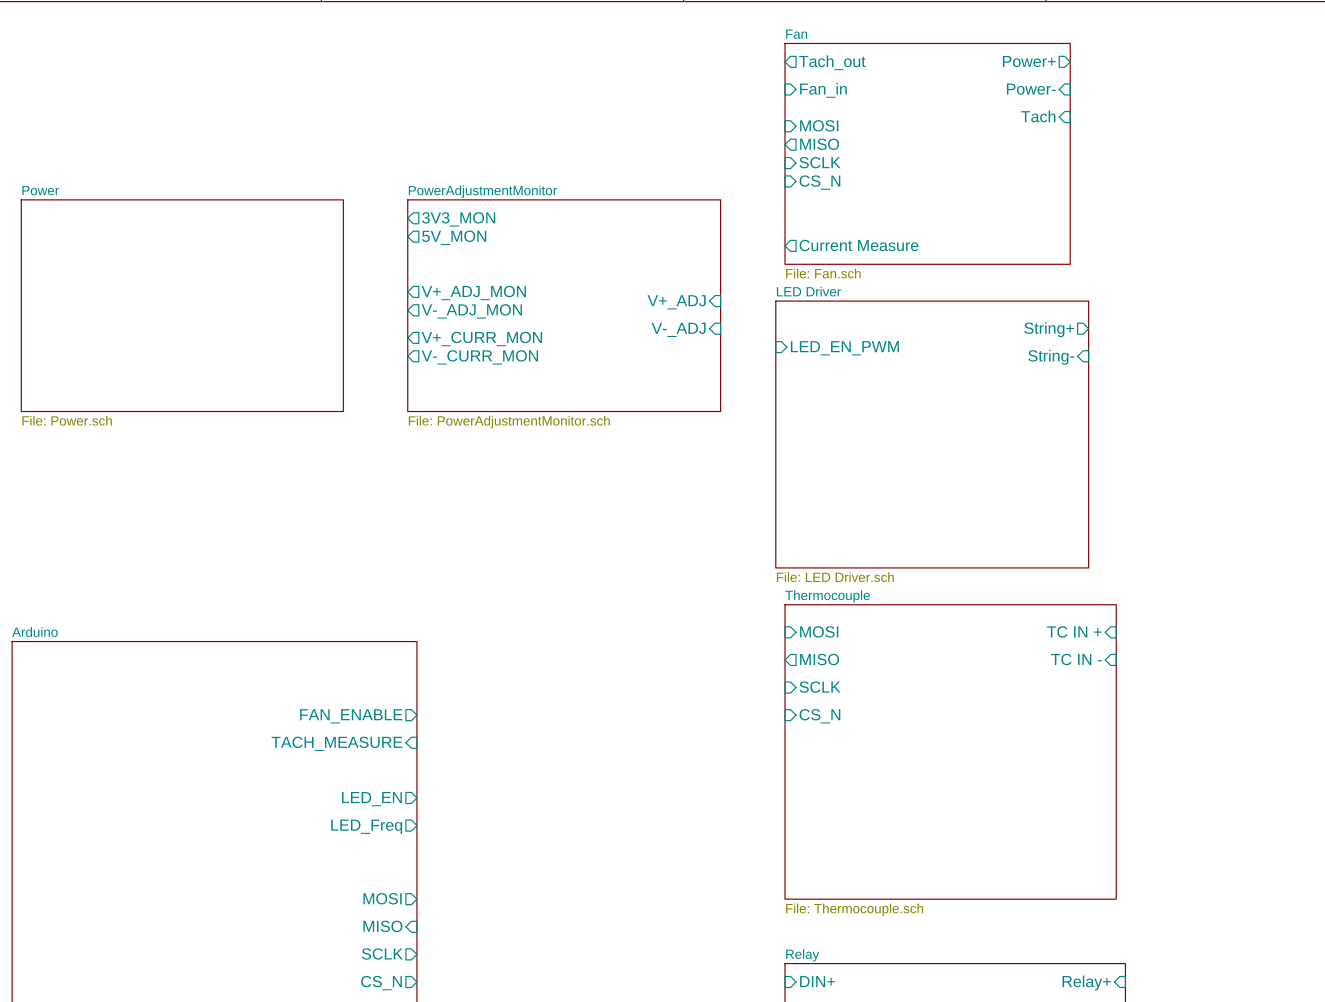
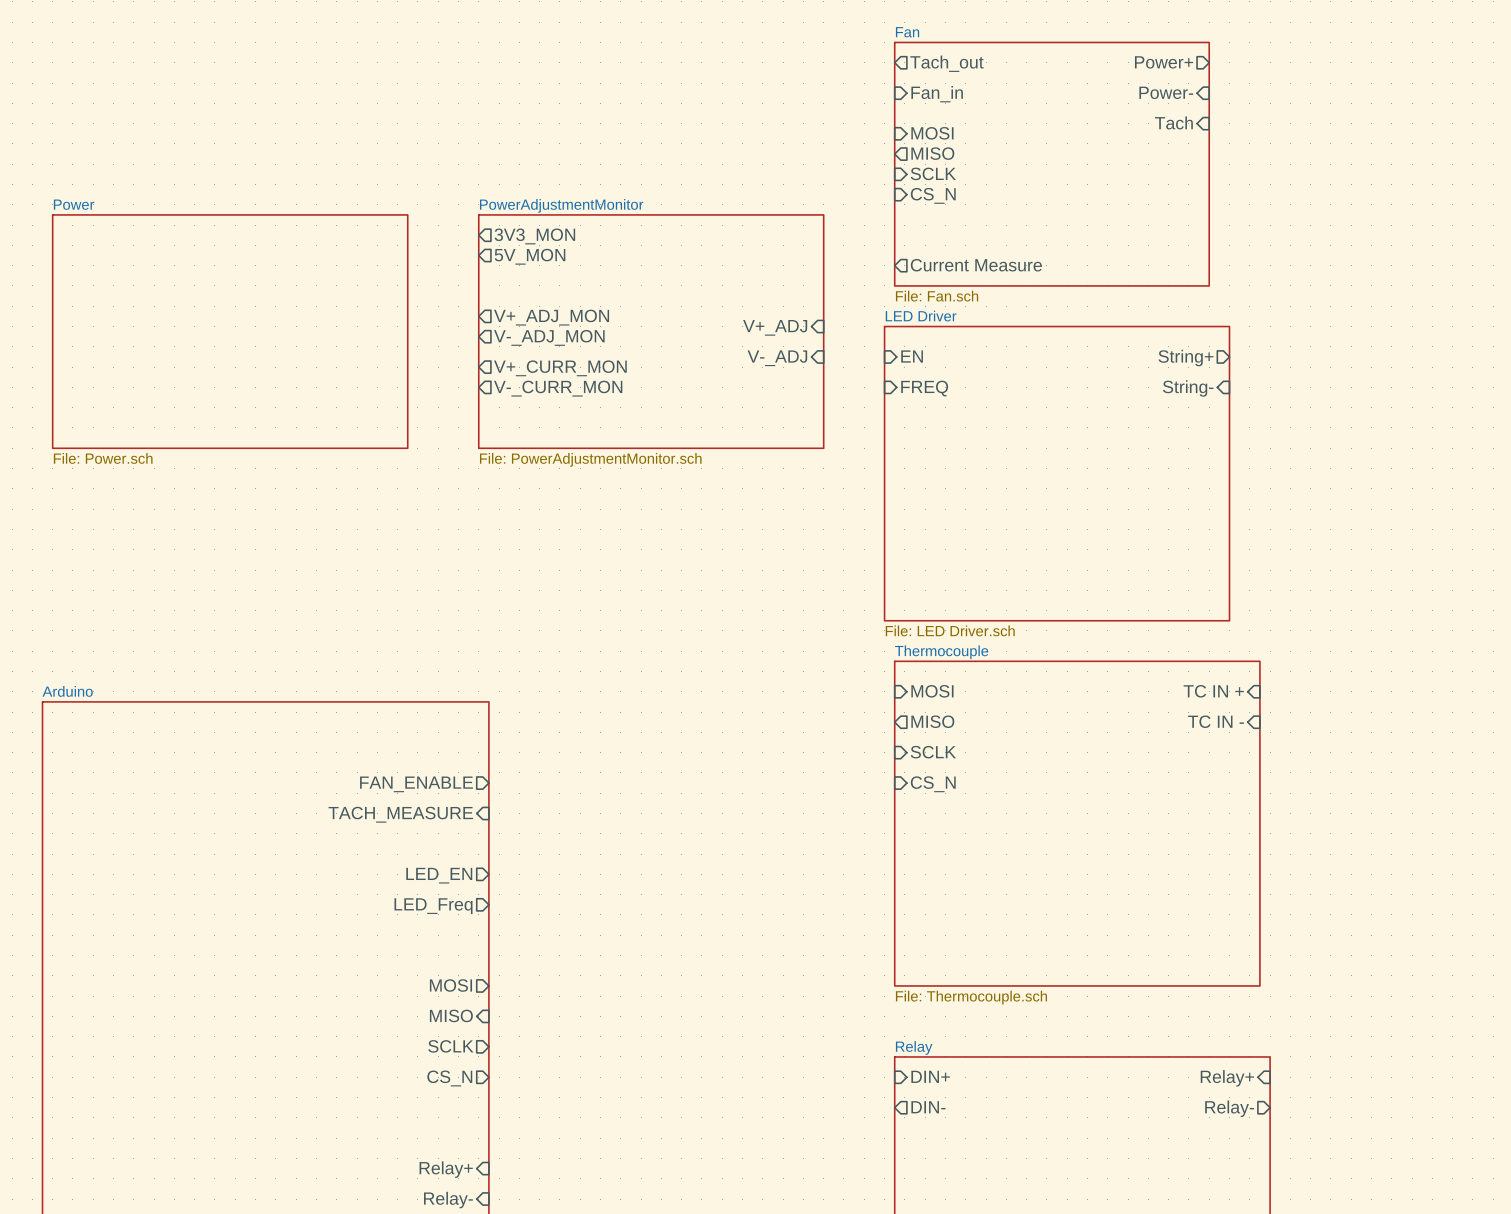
sheet pin: none -> EN (912, 356)
sheet pin: LED_EN_PWM (844, 348) -> none
sheet pin: none -> FREQ (924, 388)

